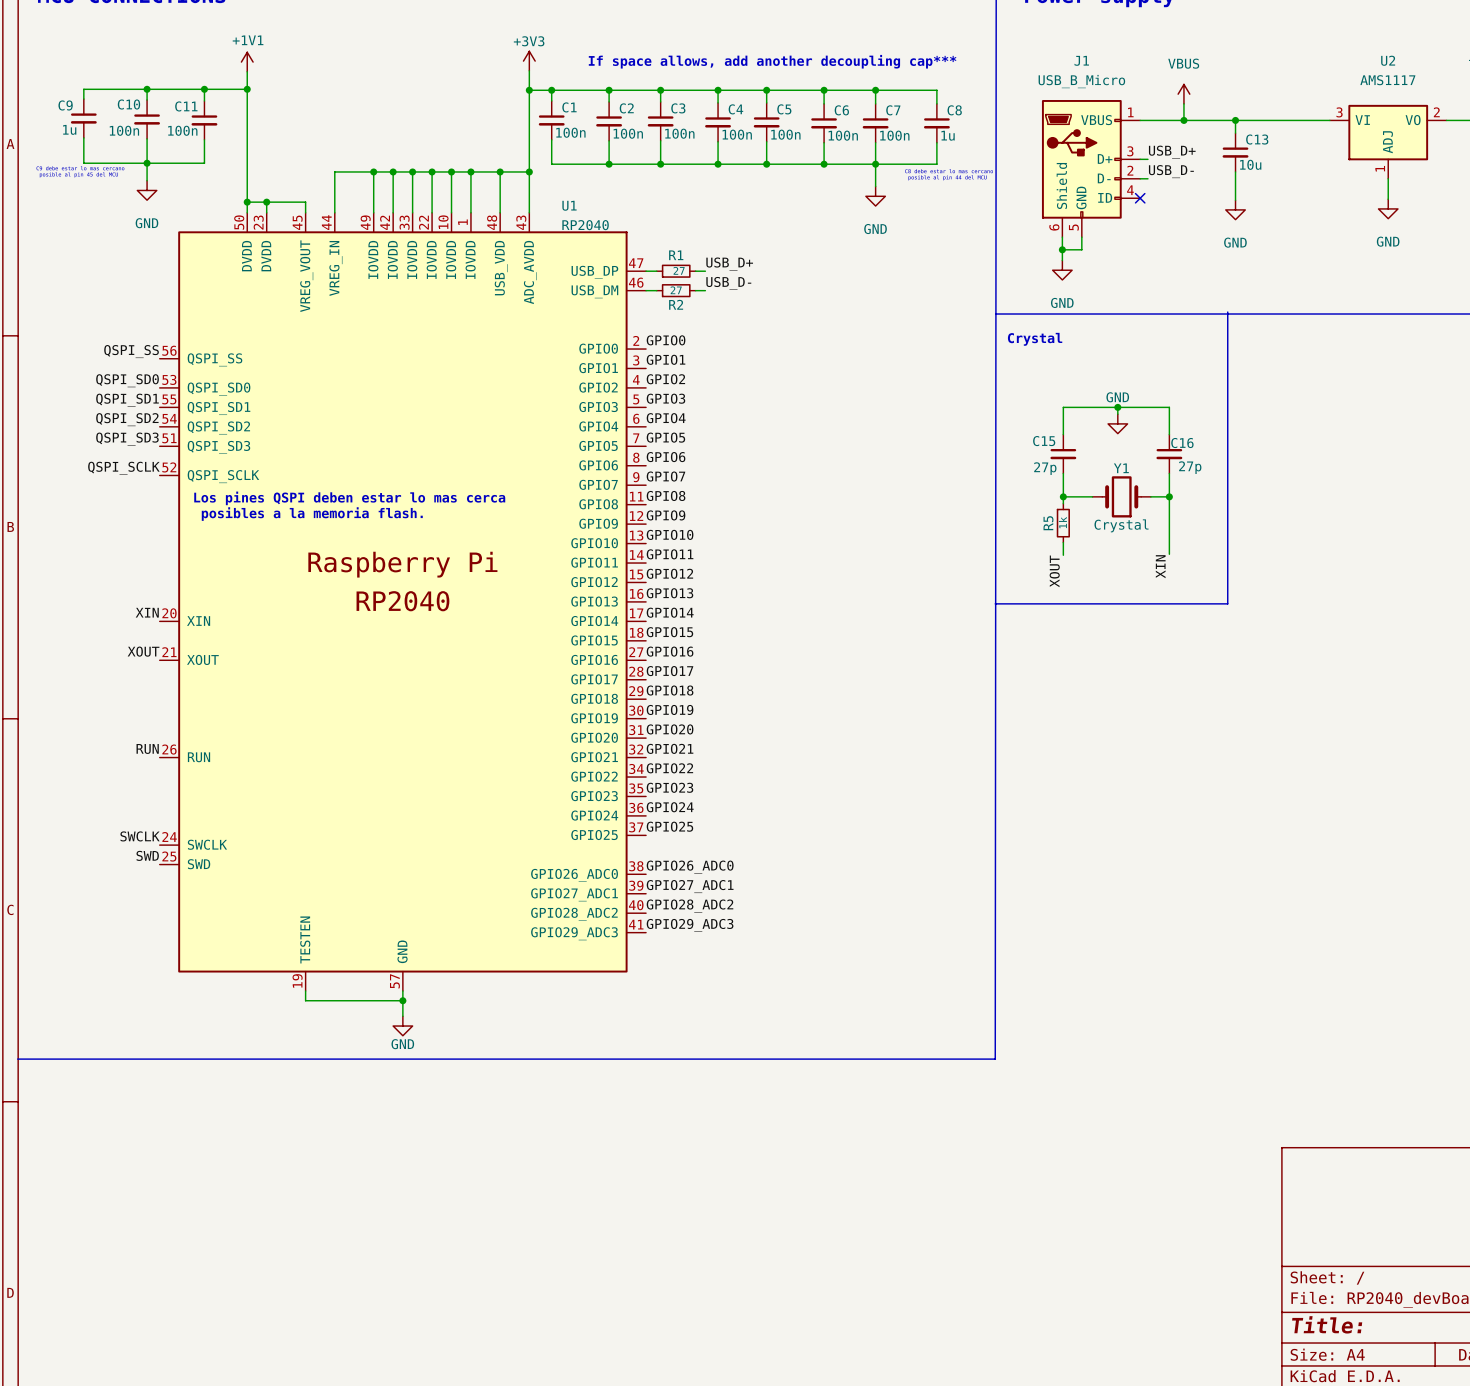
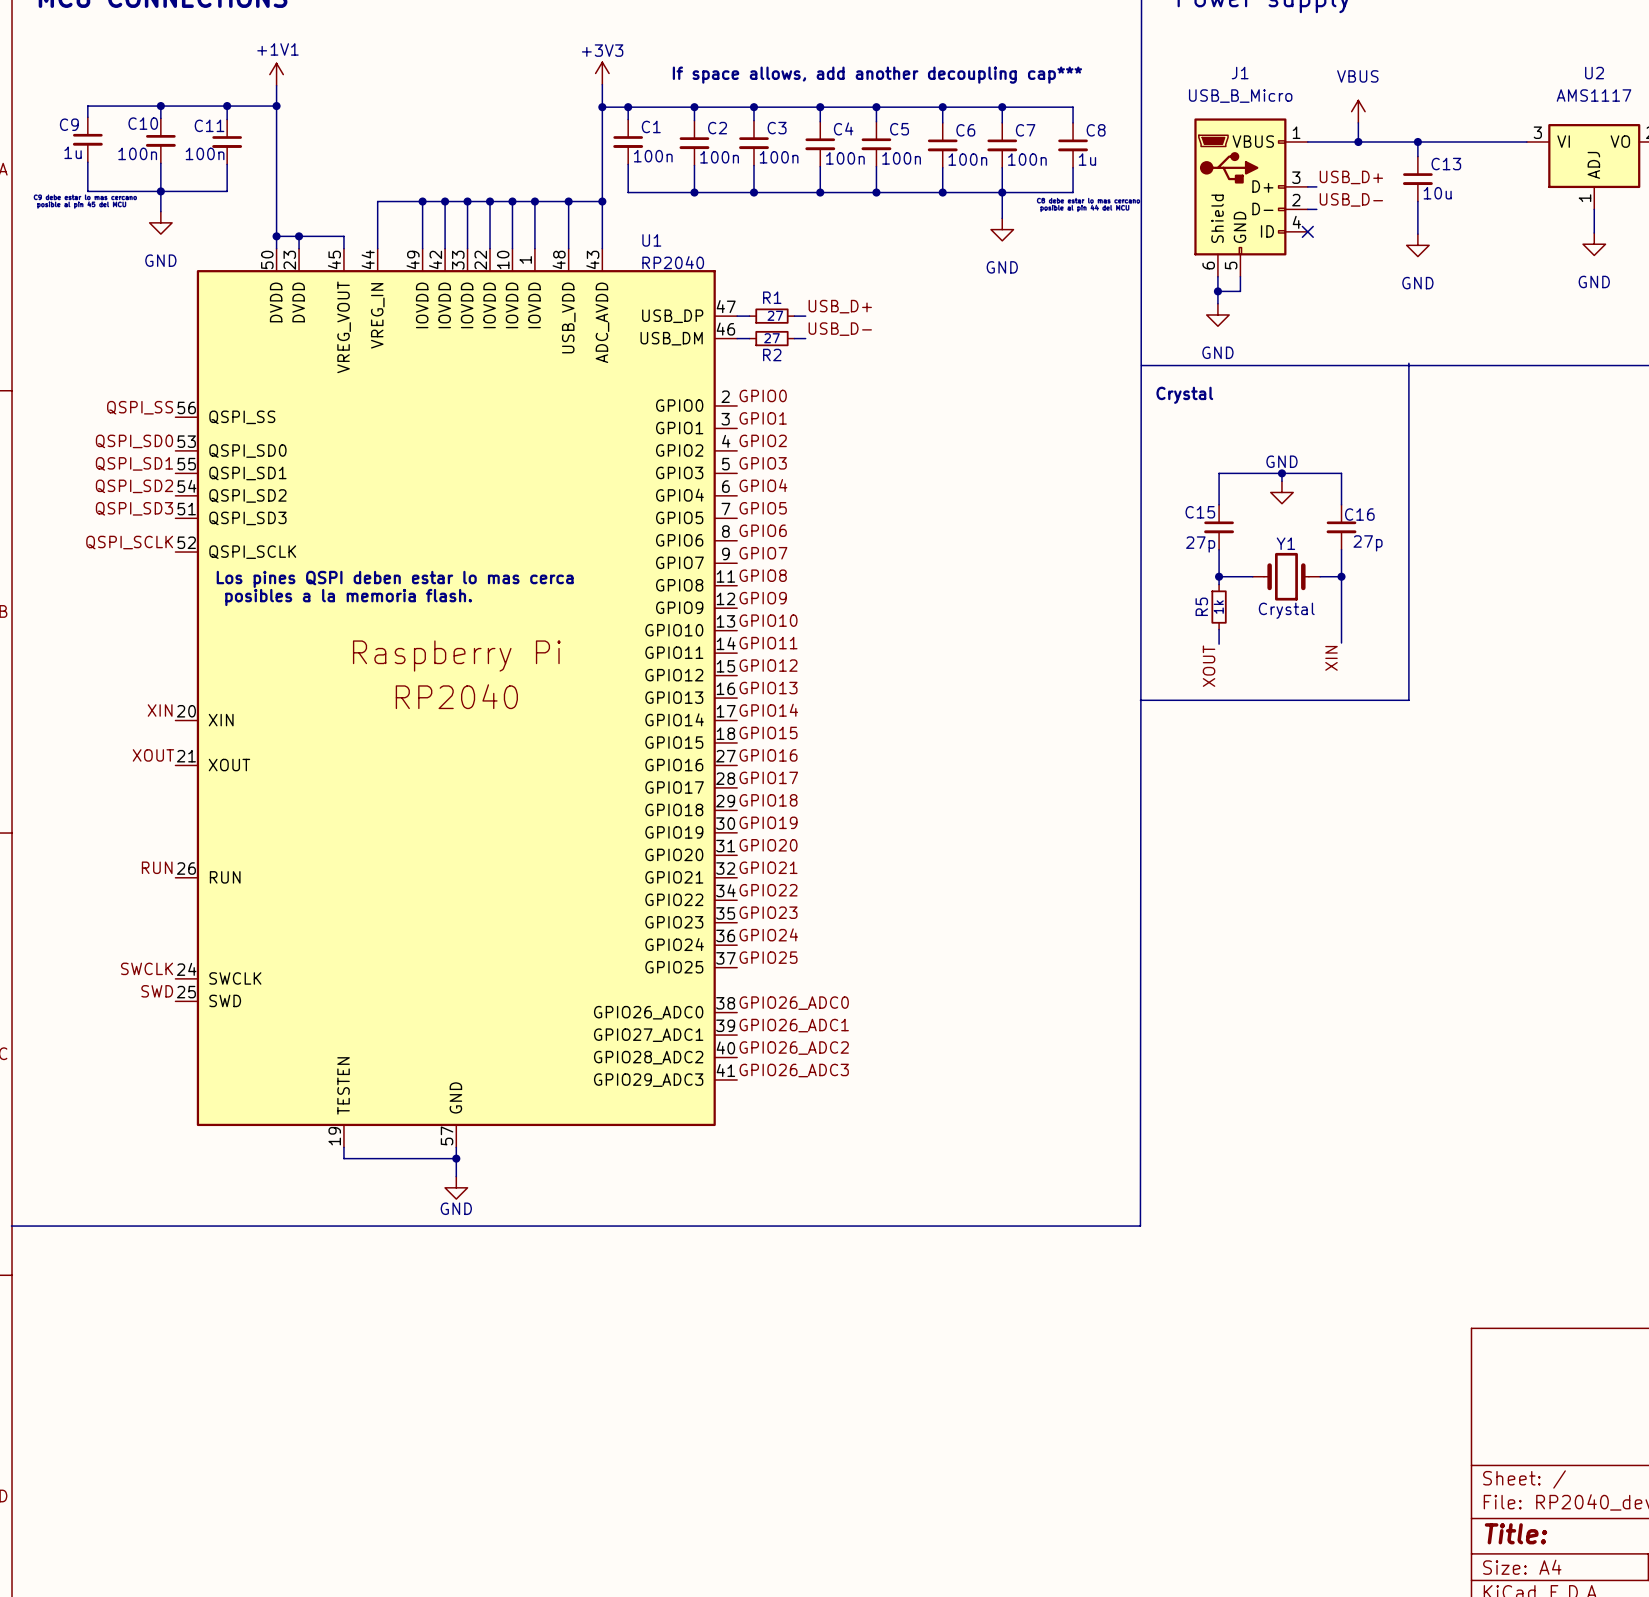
label: GPIO27_ADC1 (690, 886) -> GPIO26_ADC1 (794, 1025)
label: GPIO28_ADC2 (690, 905) -> GPIO26_ADC2 (794, 1048)
label: GPIO29_ADC3 (690, 925) -> GPIO26_ADC3 (794, 1070)

